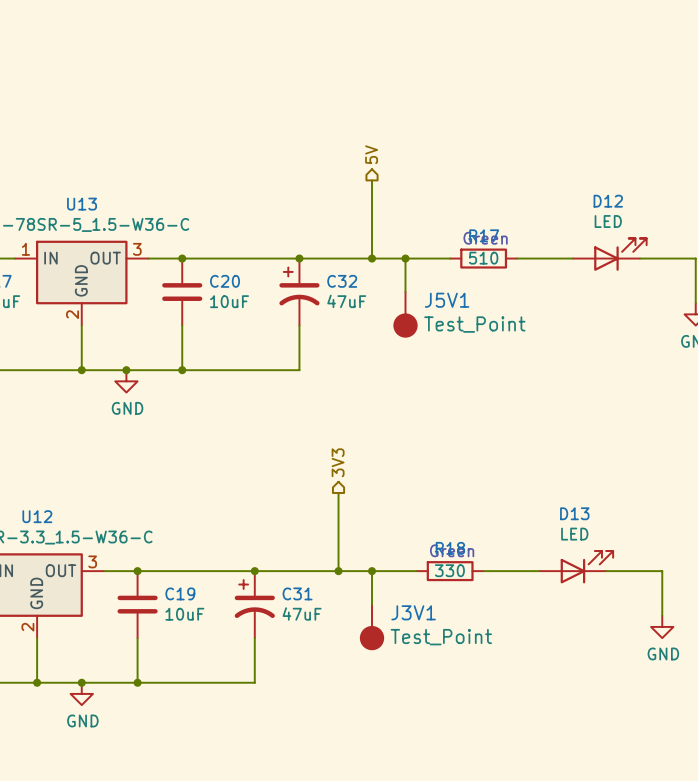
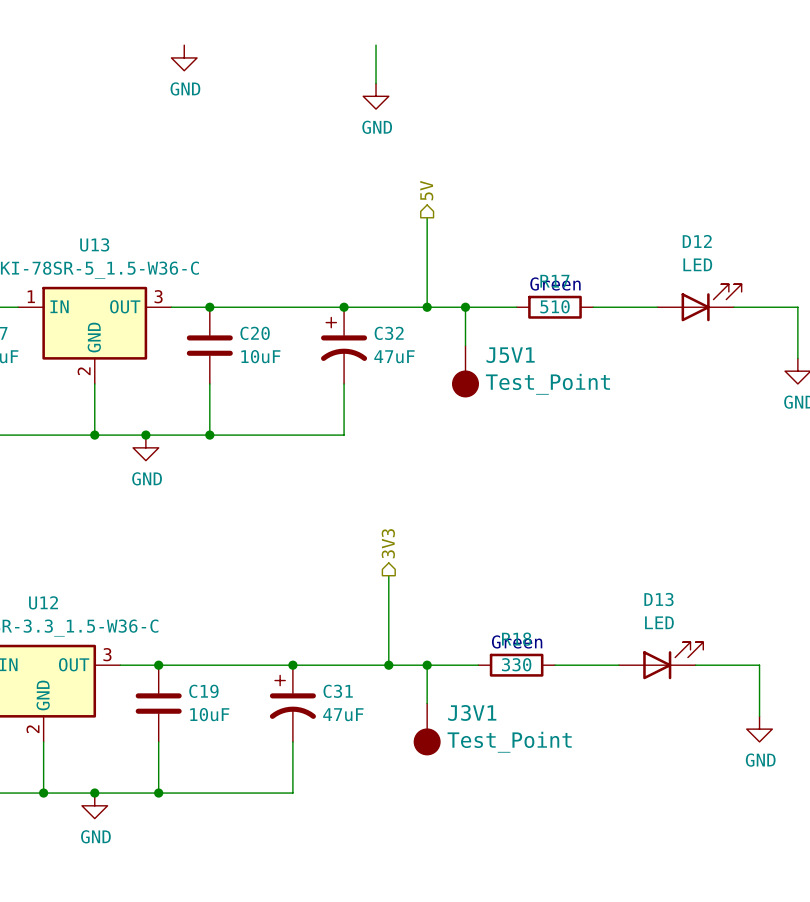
wire: none -> (376, 45) (376, 83)
power symbol: none -> GND (184, 57)
power symbol: none -> GND (376, 96)

